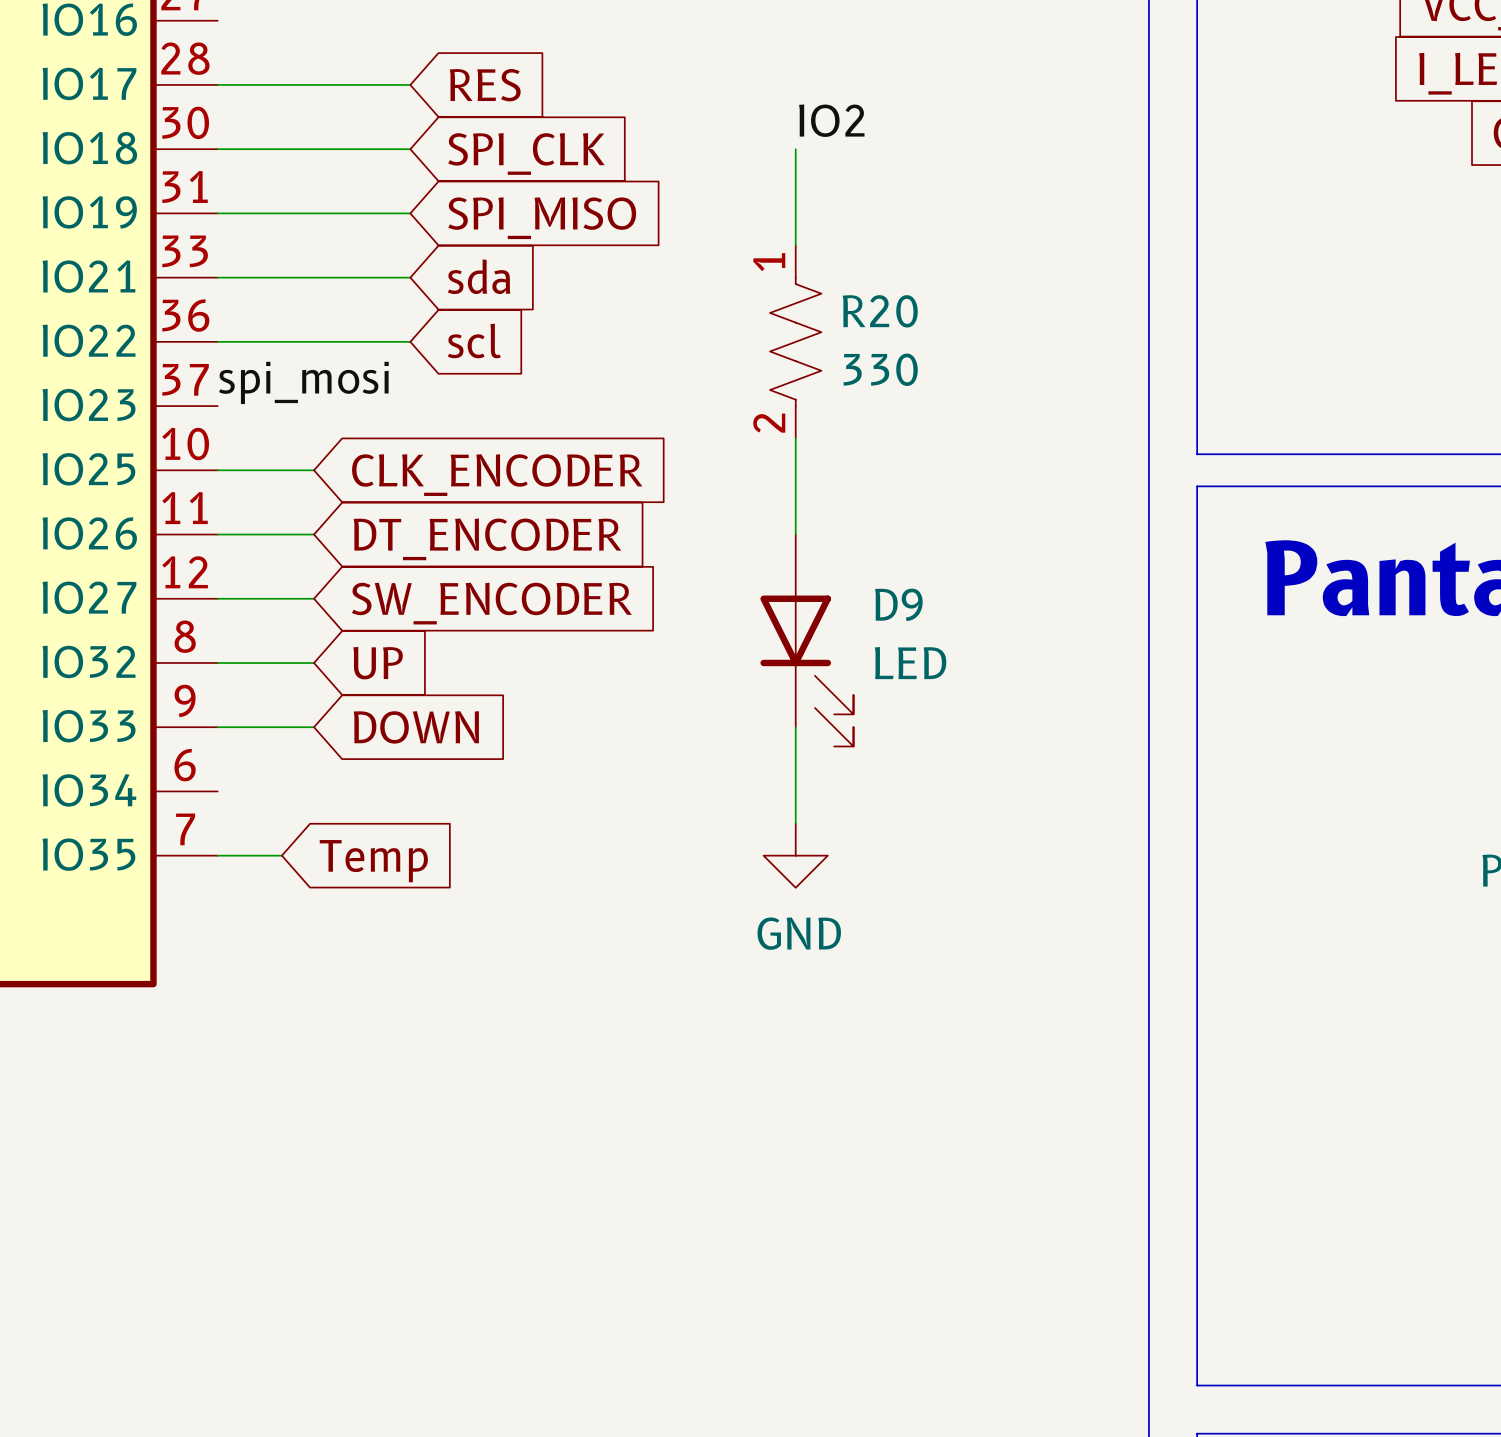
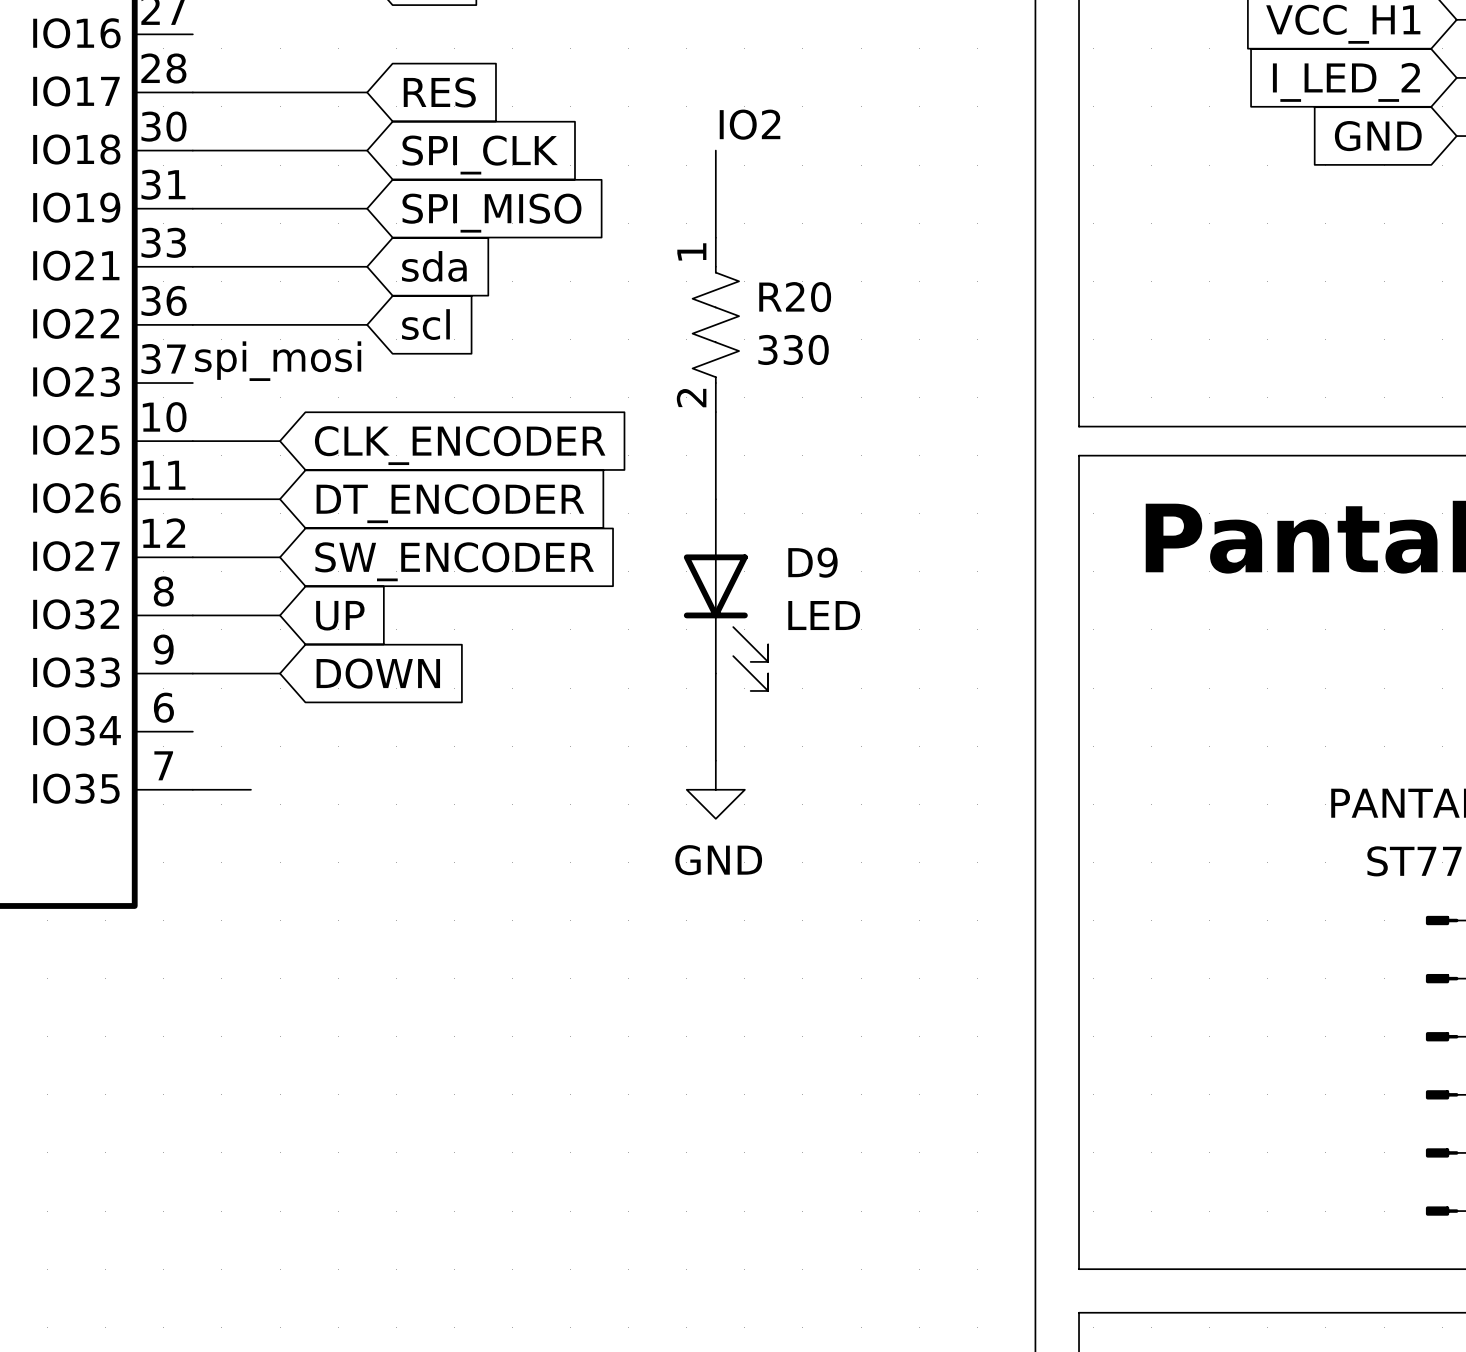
global label: Temp (373, 861) -> none

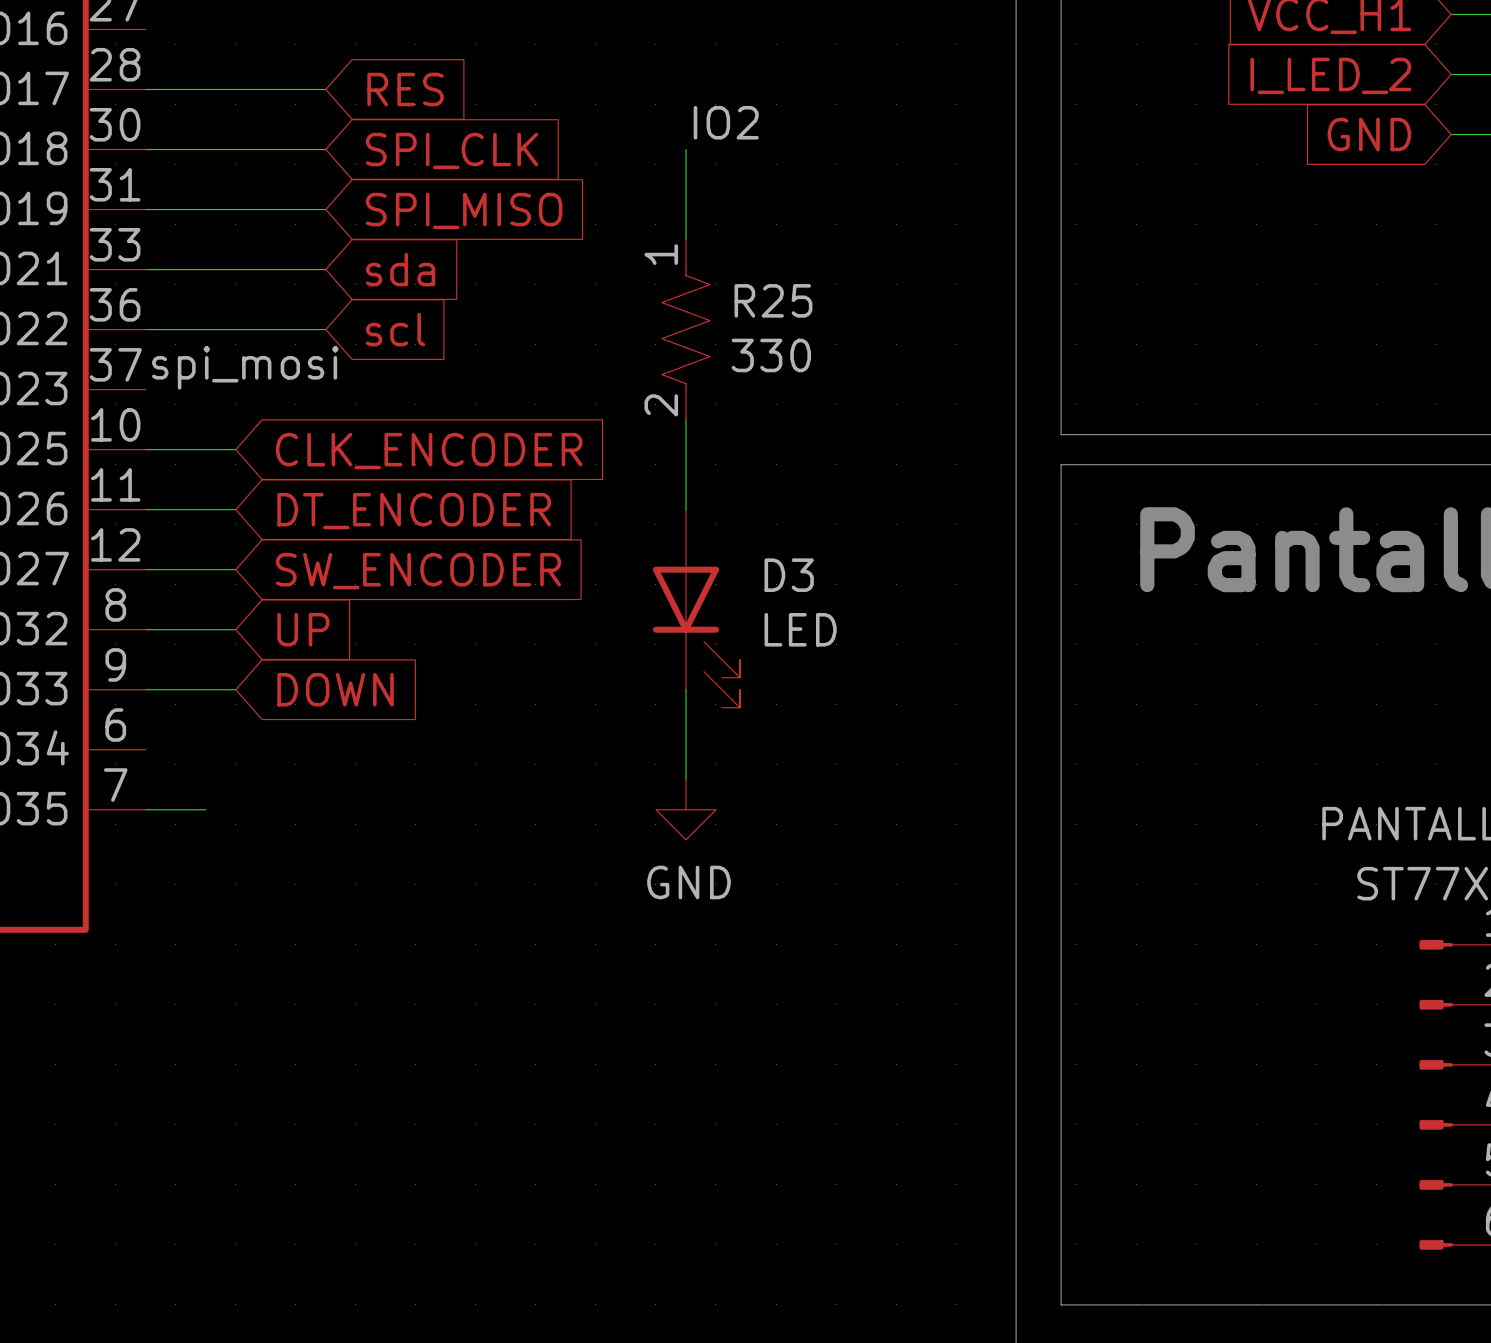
R20 name: R20 (795, 297) -> R25 (773, 300)
D9 name: D9 (812, 562) -> D3 (789, 575)

